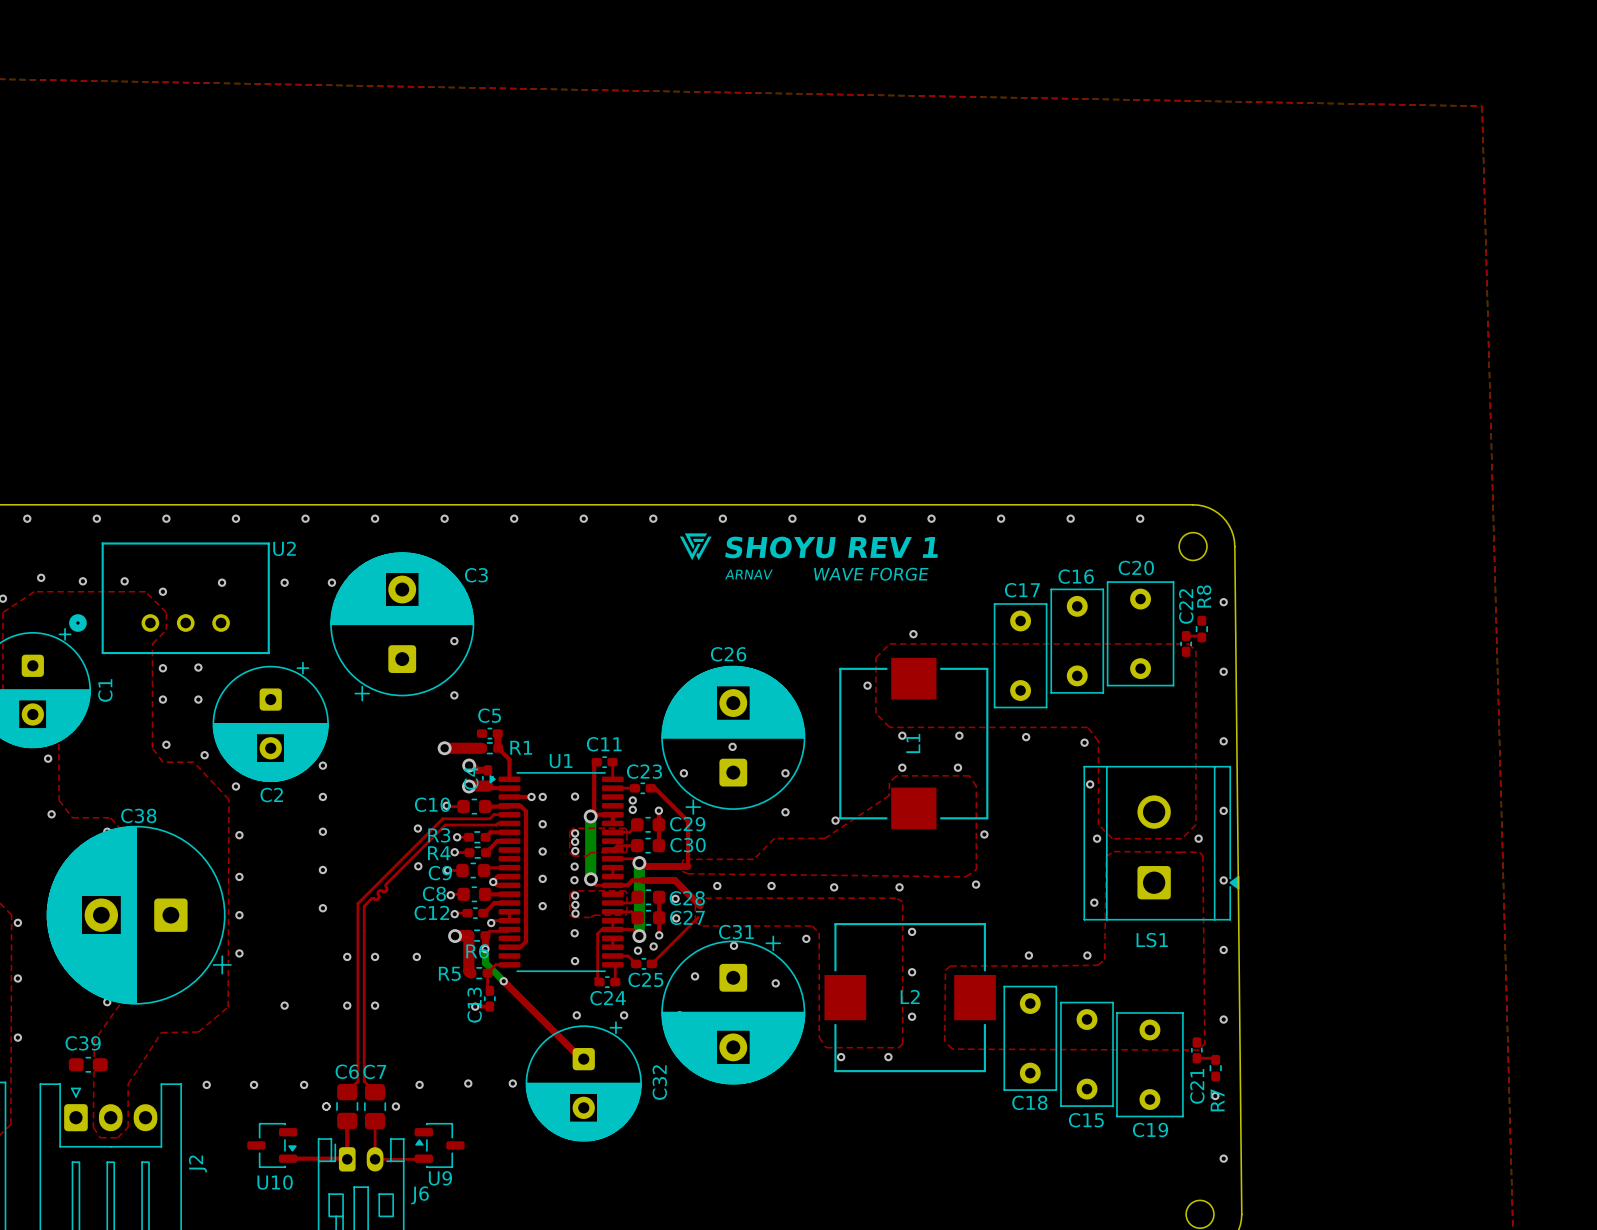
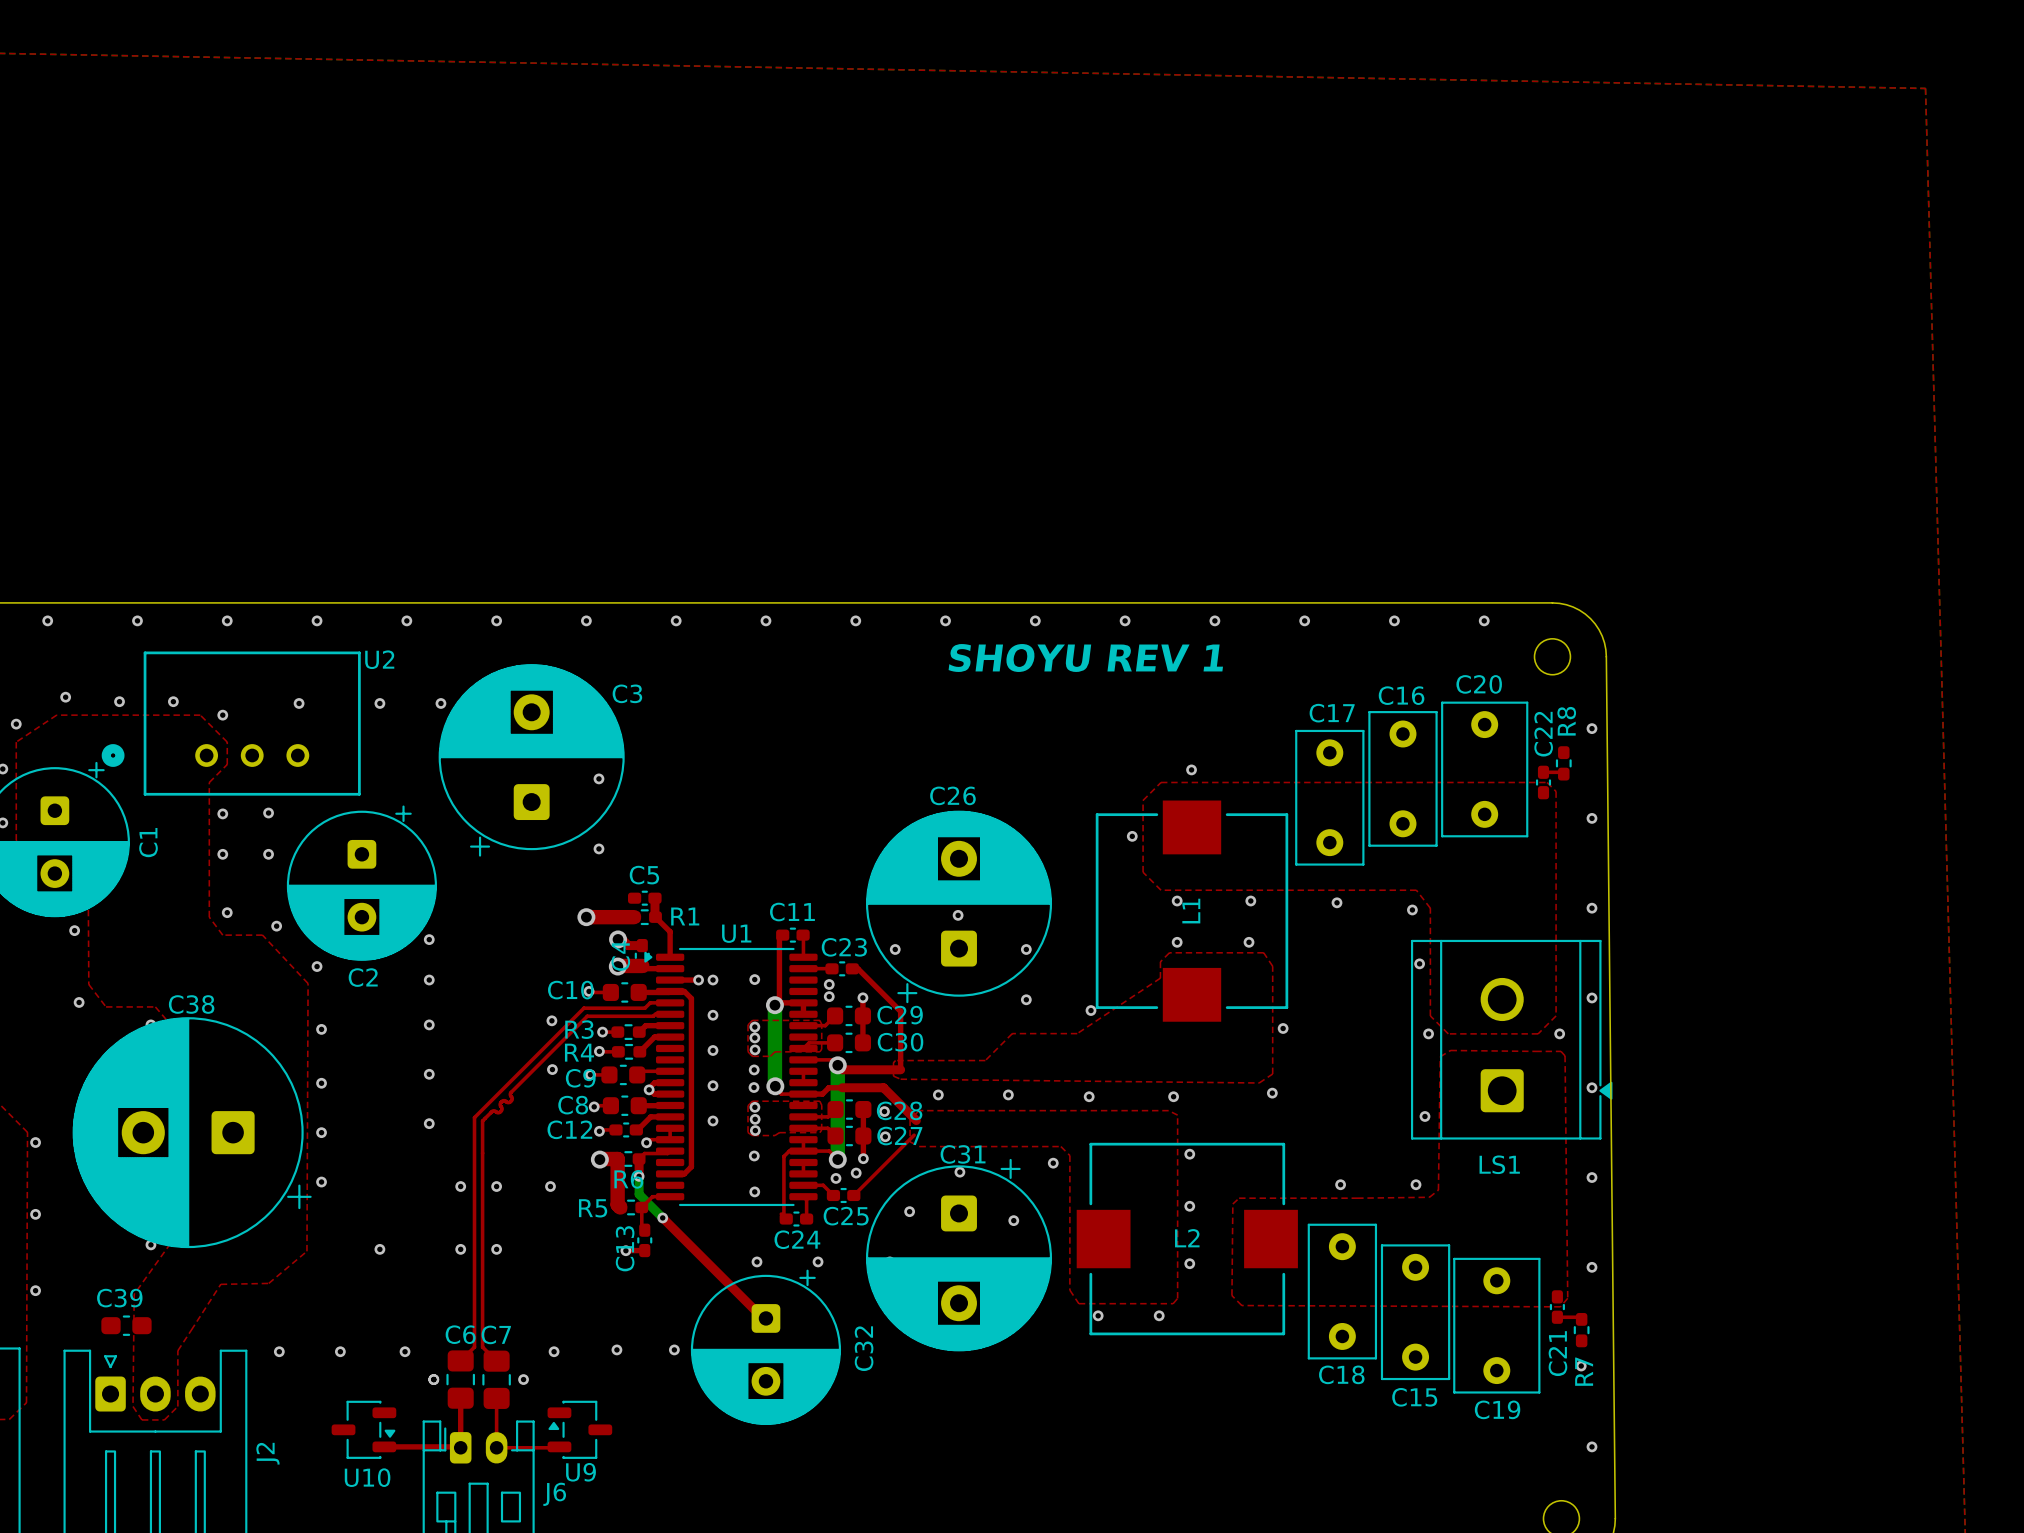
drawing: [679, 533, 712, 561] -> none
text: ARNAV (748, 574) -> none
text: WAVE FORGE (871, 574) -> none

